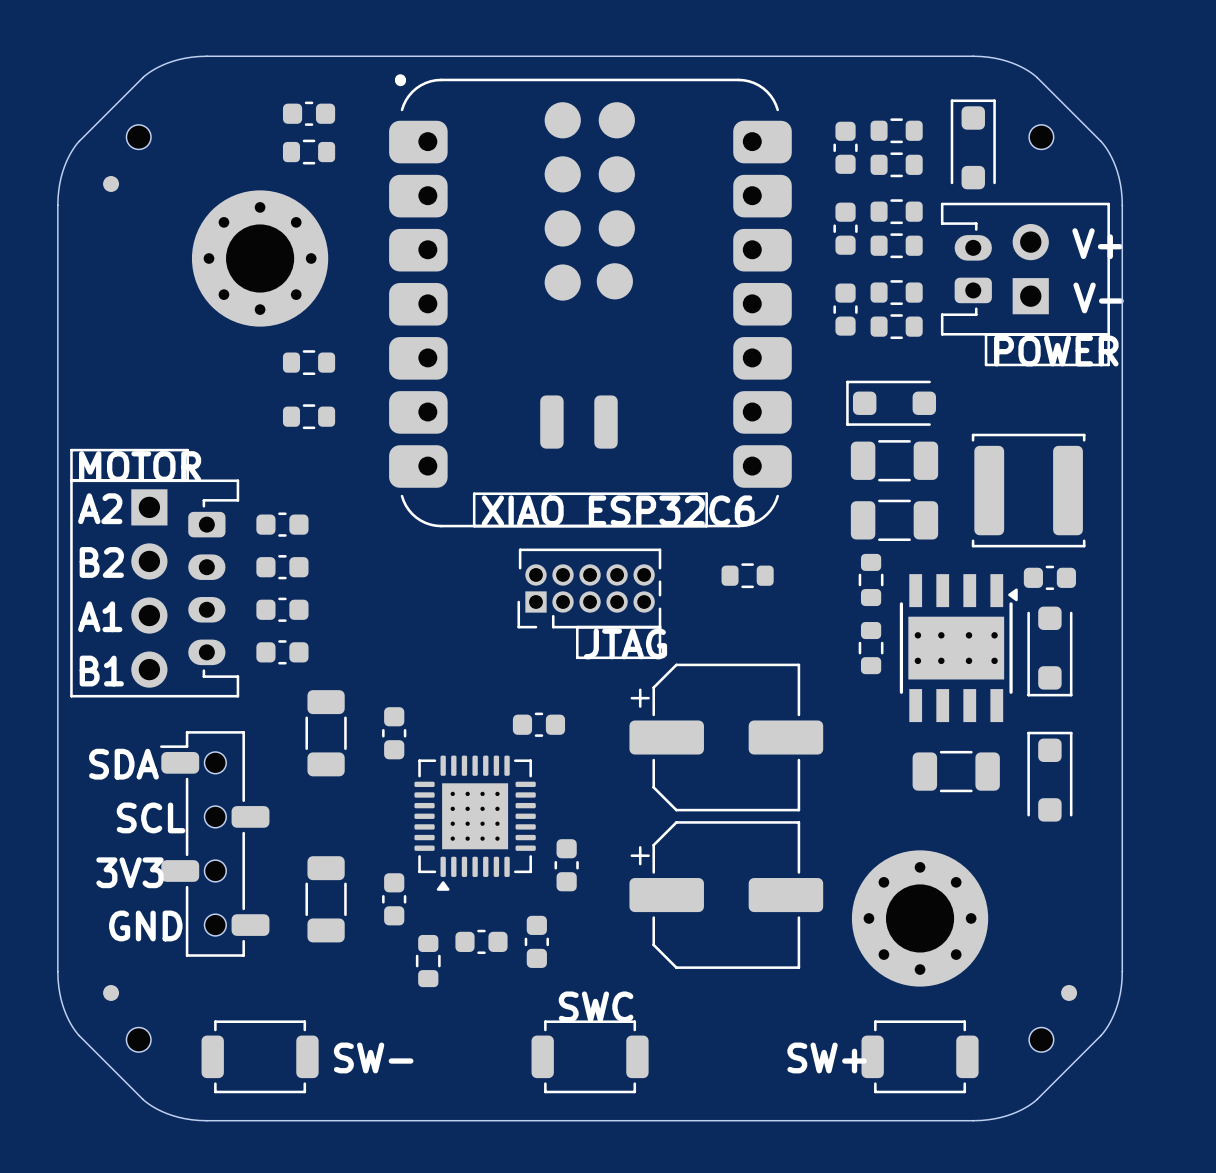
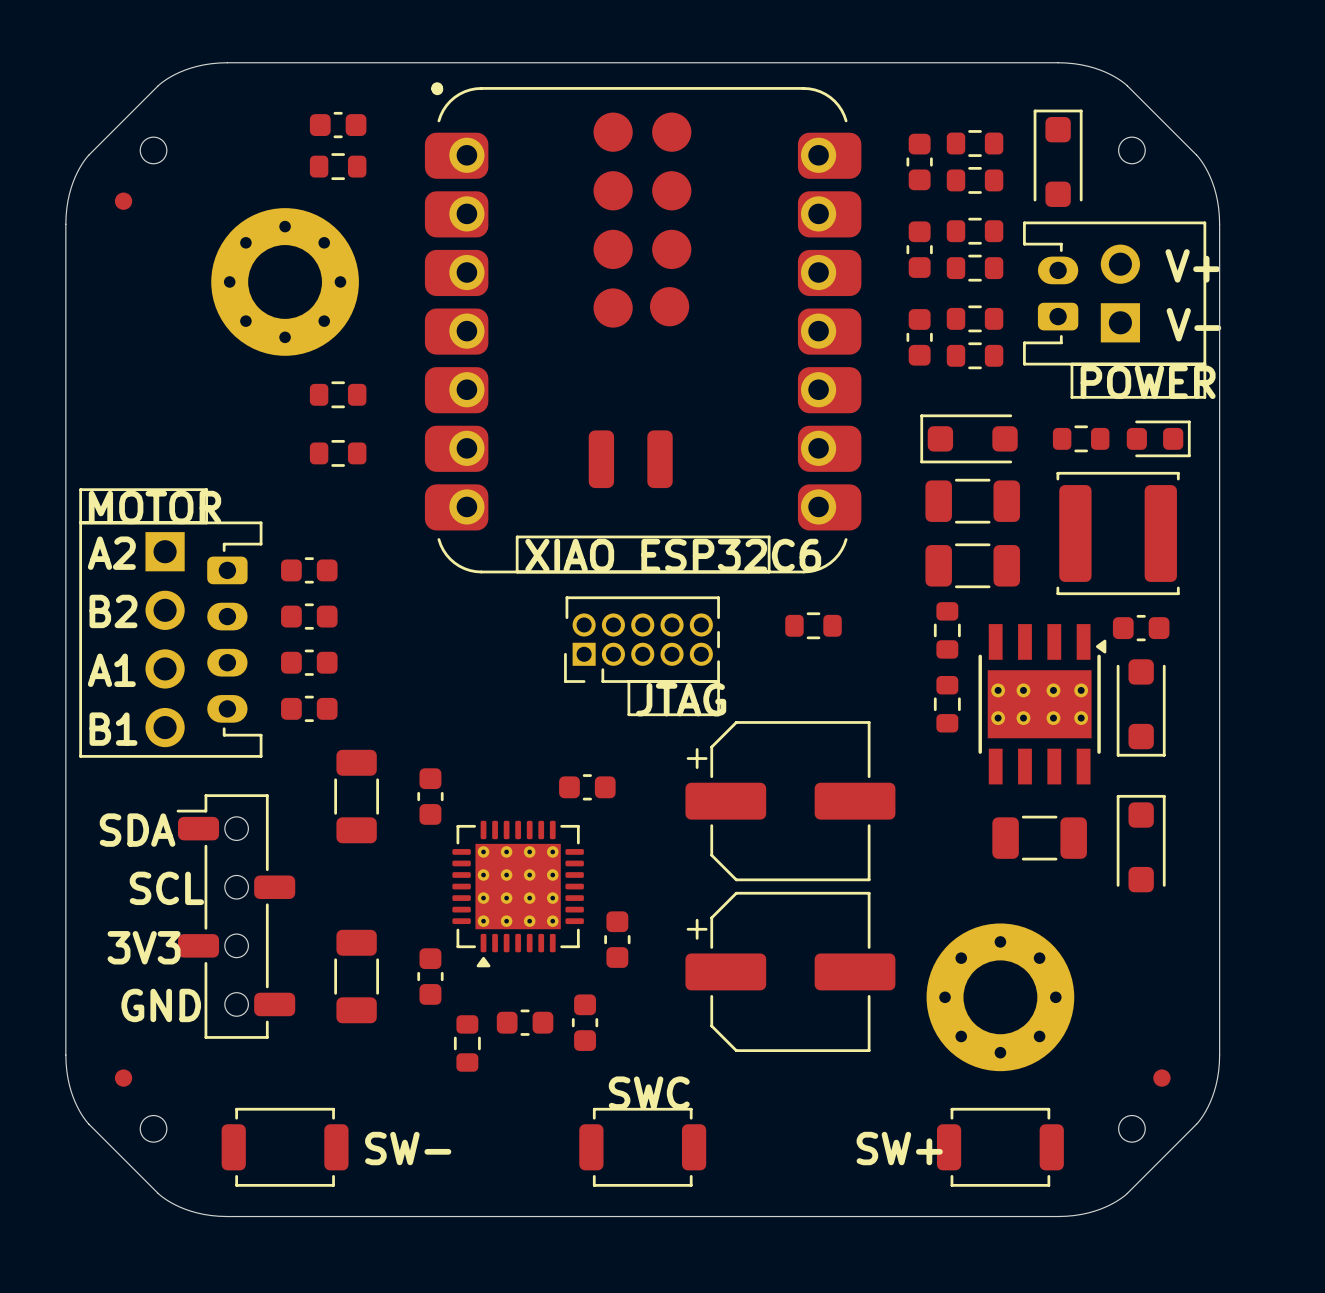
part: none -> (1081, 438)
part: none -> (1158, 438)
part footprint: [414, 755, 536, 891] -> [452, 820, 584, 968]

